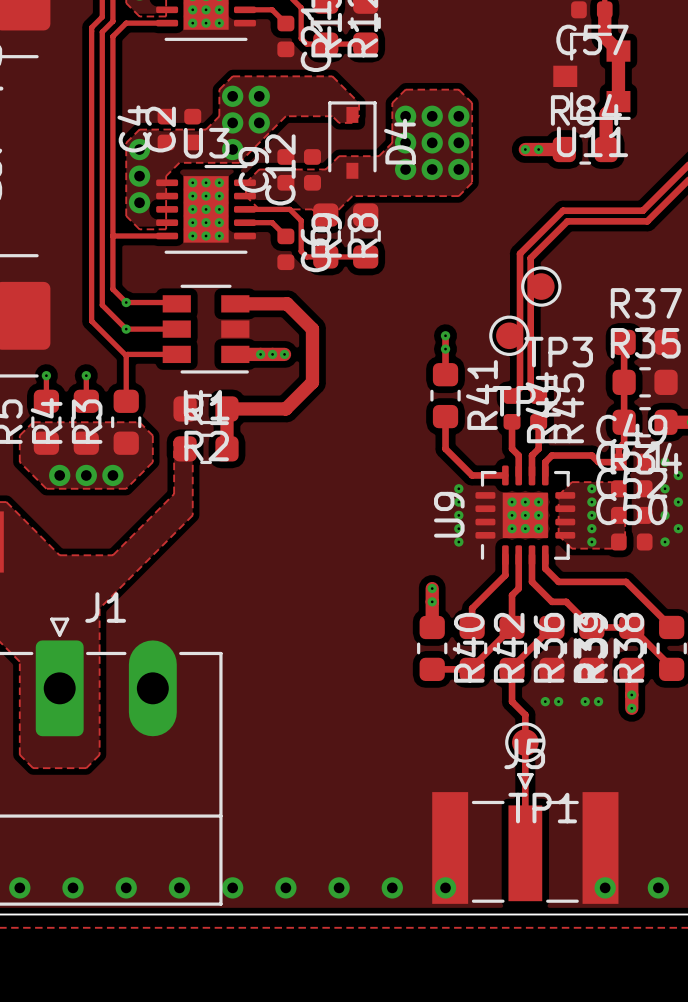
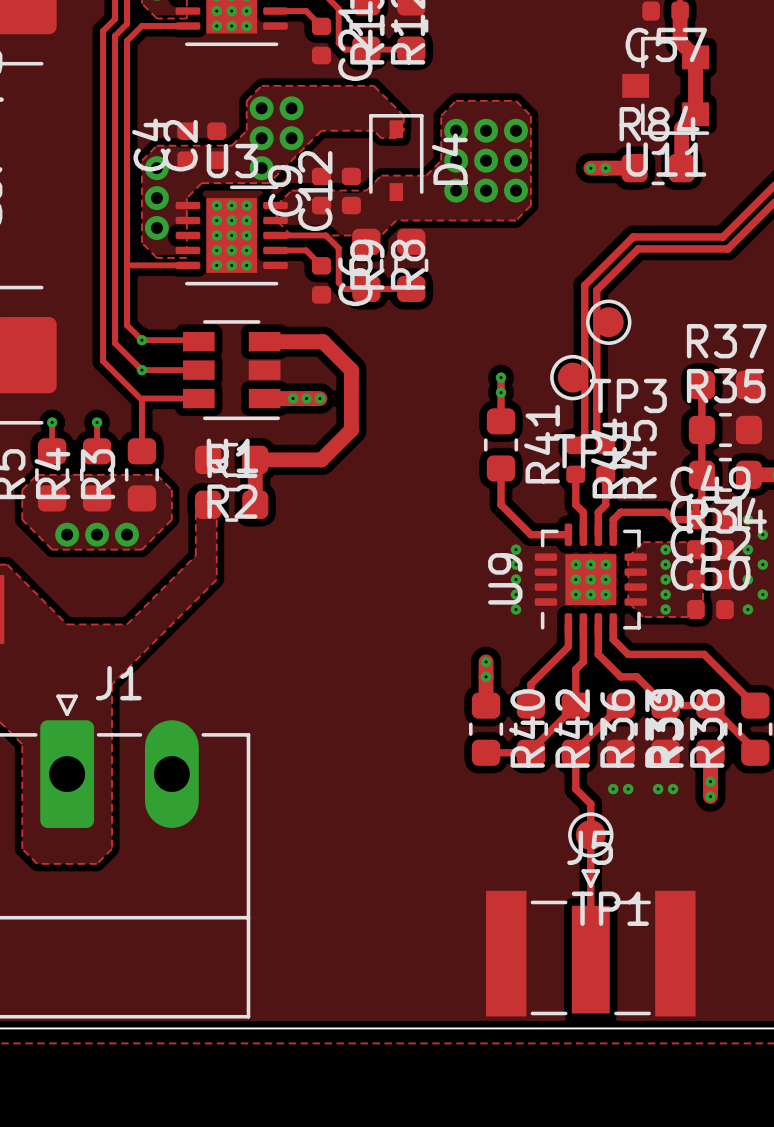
via: (19, 887) -> none
via: (73, 887) -> none
via: (126, 887) -> none
via: (179, 887) -> none
via: (232, 887) -> none
via: (285, 887) -> none
via: (339, 887) -> none
via: (392, 887) -> none
via: (445, 887) -> none
via: (605, 887) -> none
via: (658, 887) -> none

